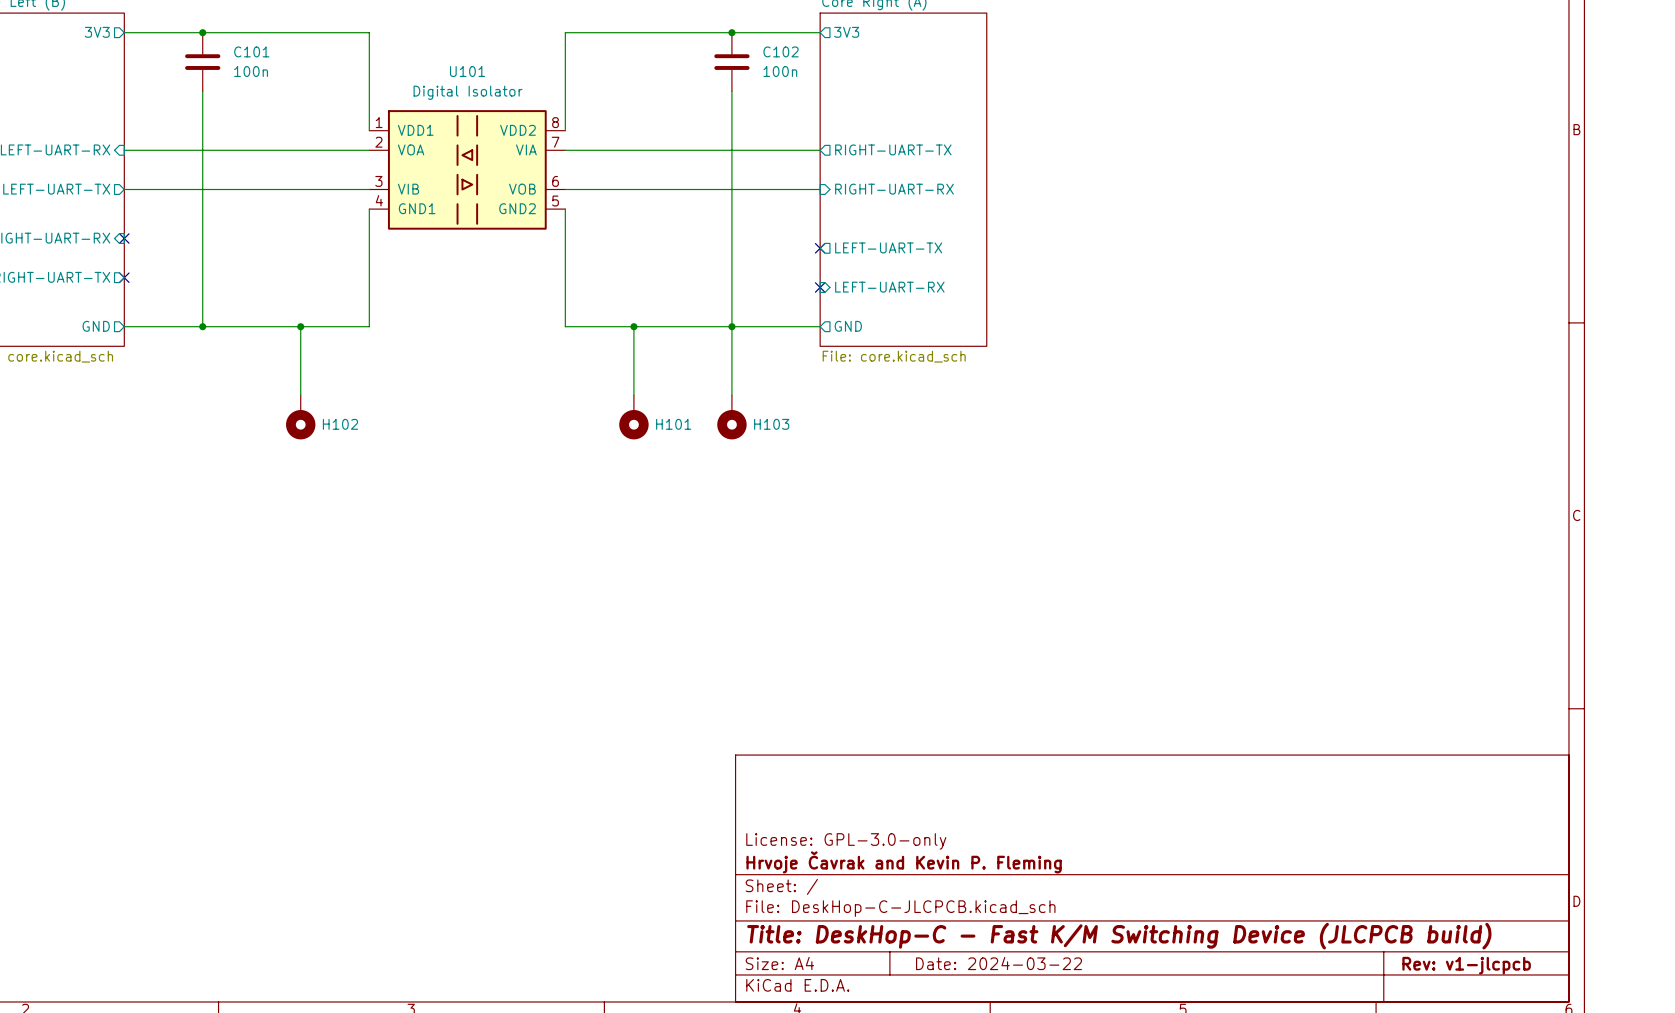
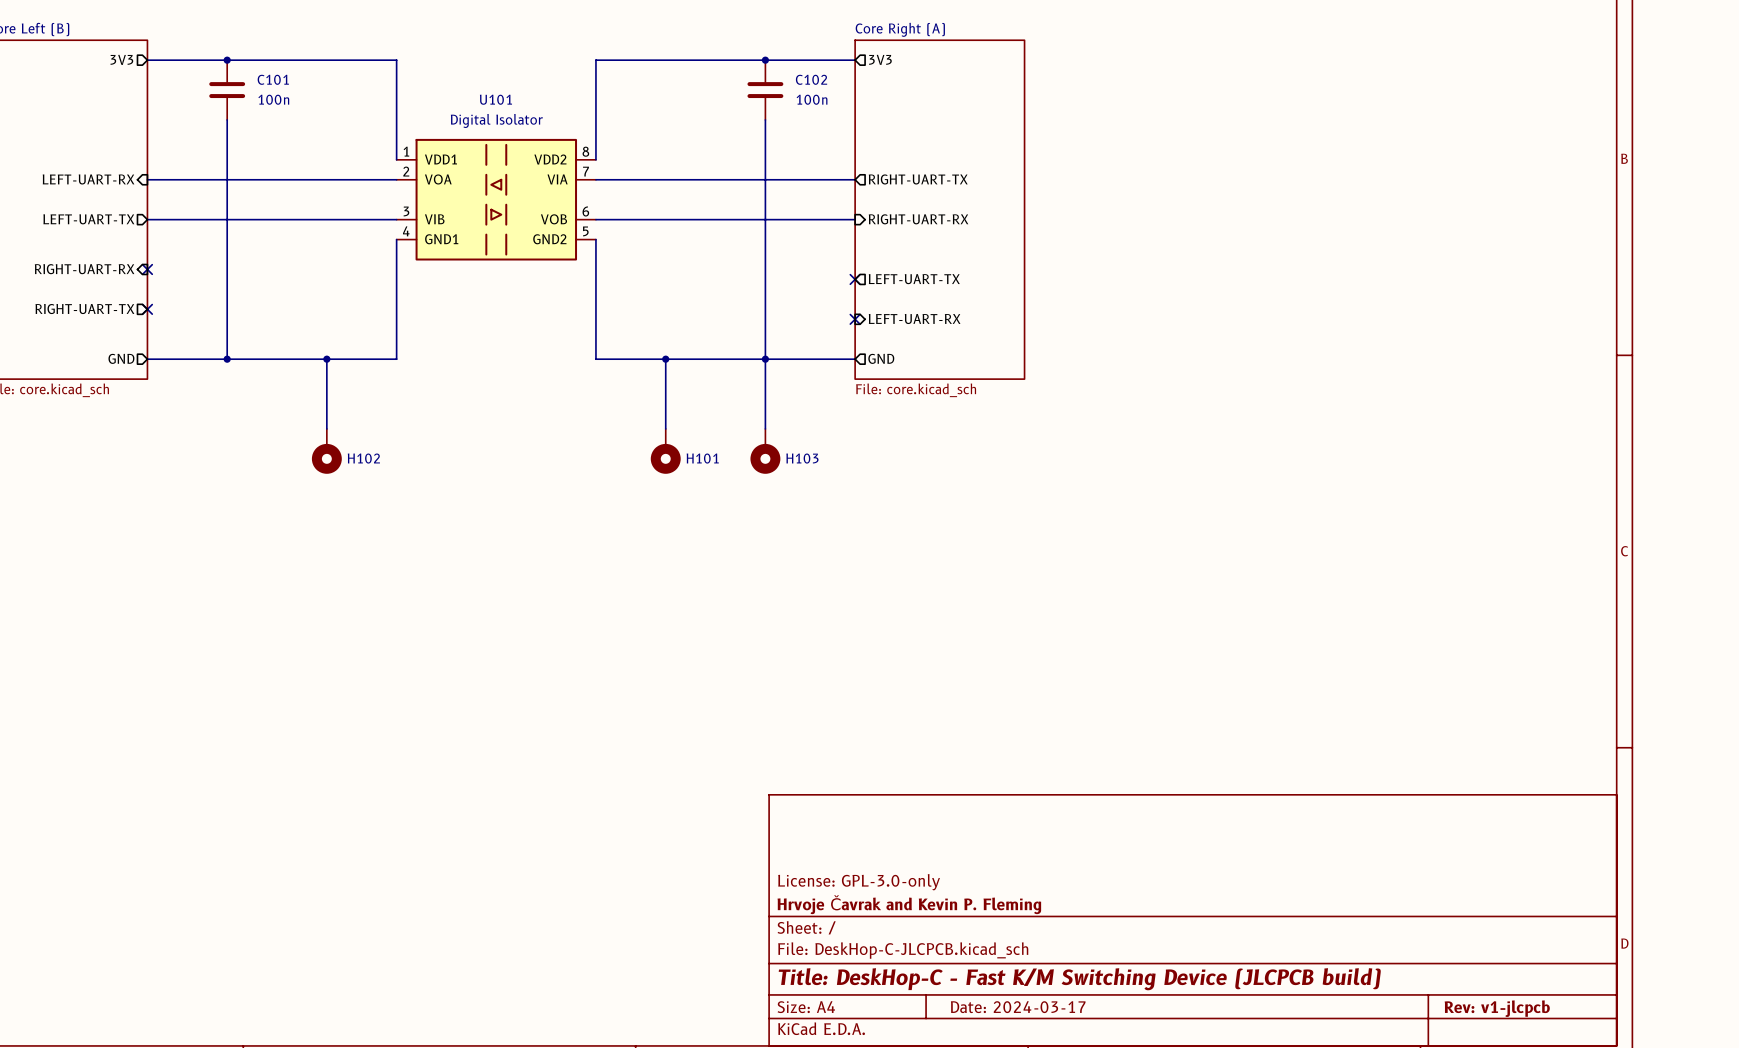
title block: Date: 2024-03-22 (998, 963) -> Date: 2024-03-17 (1018, 1007)

